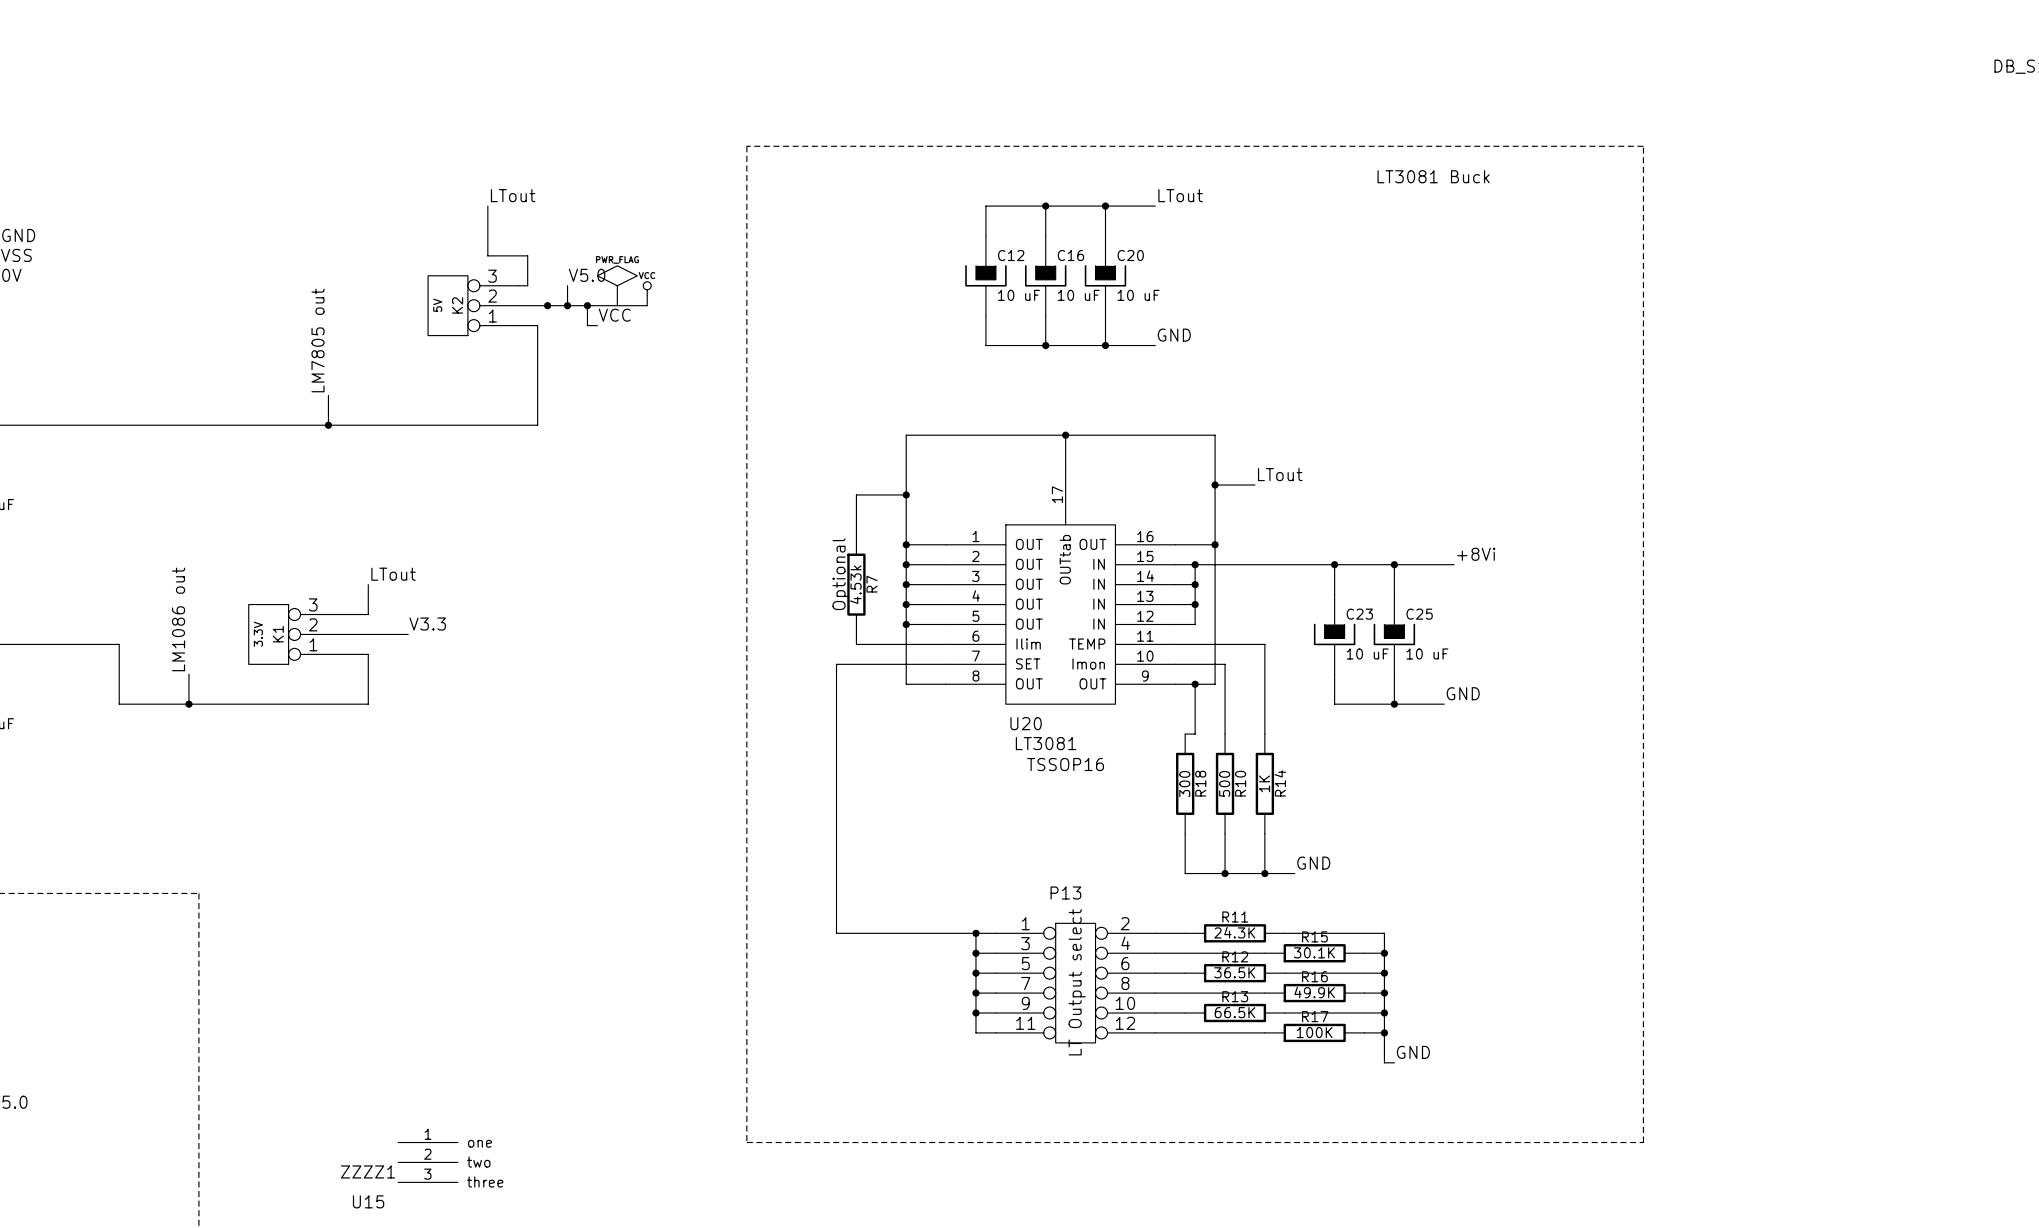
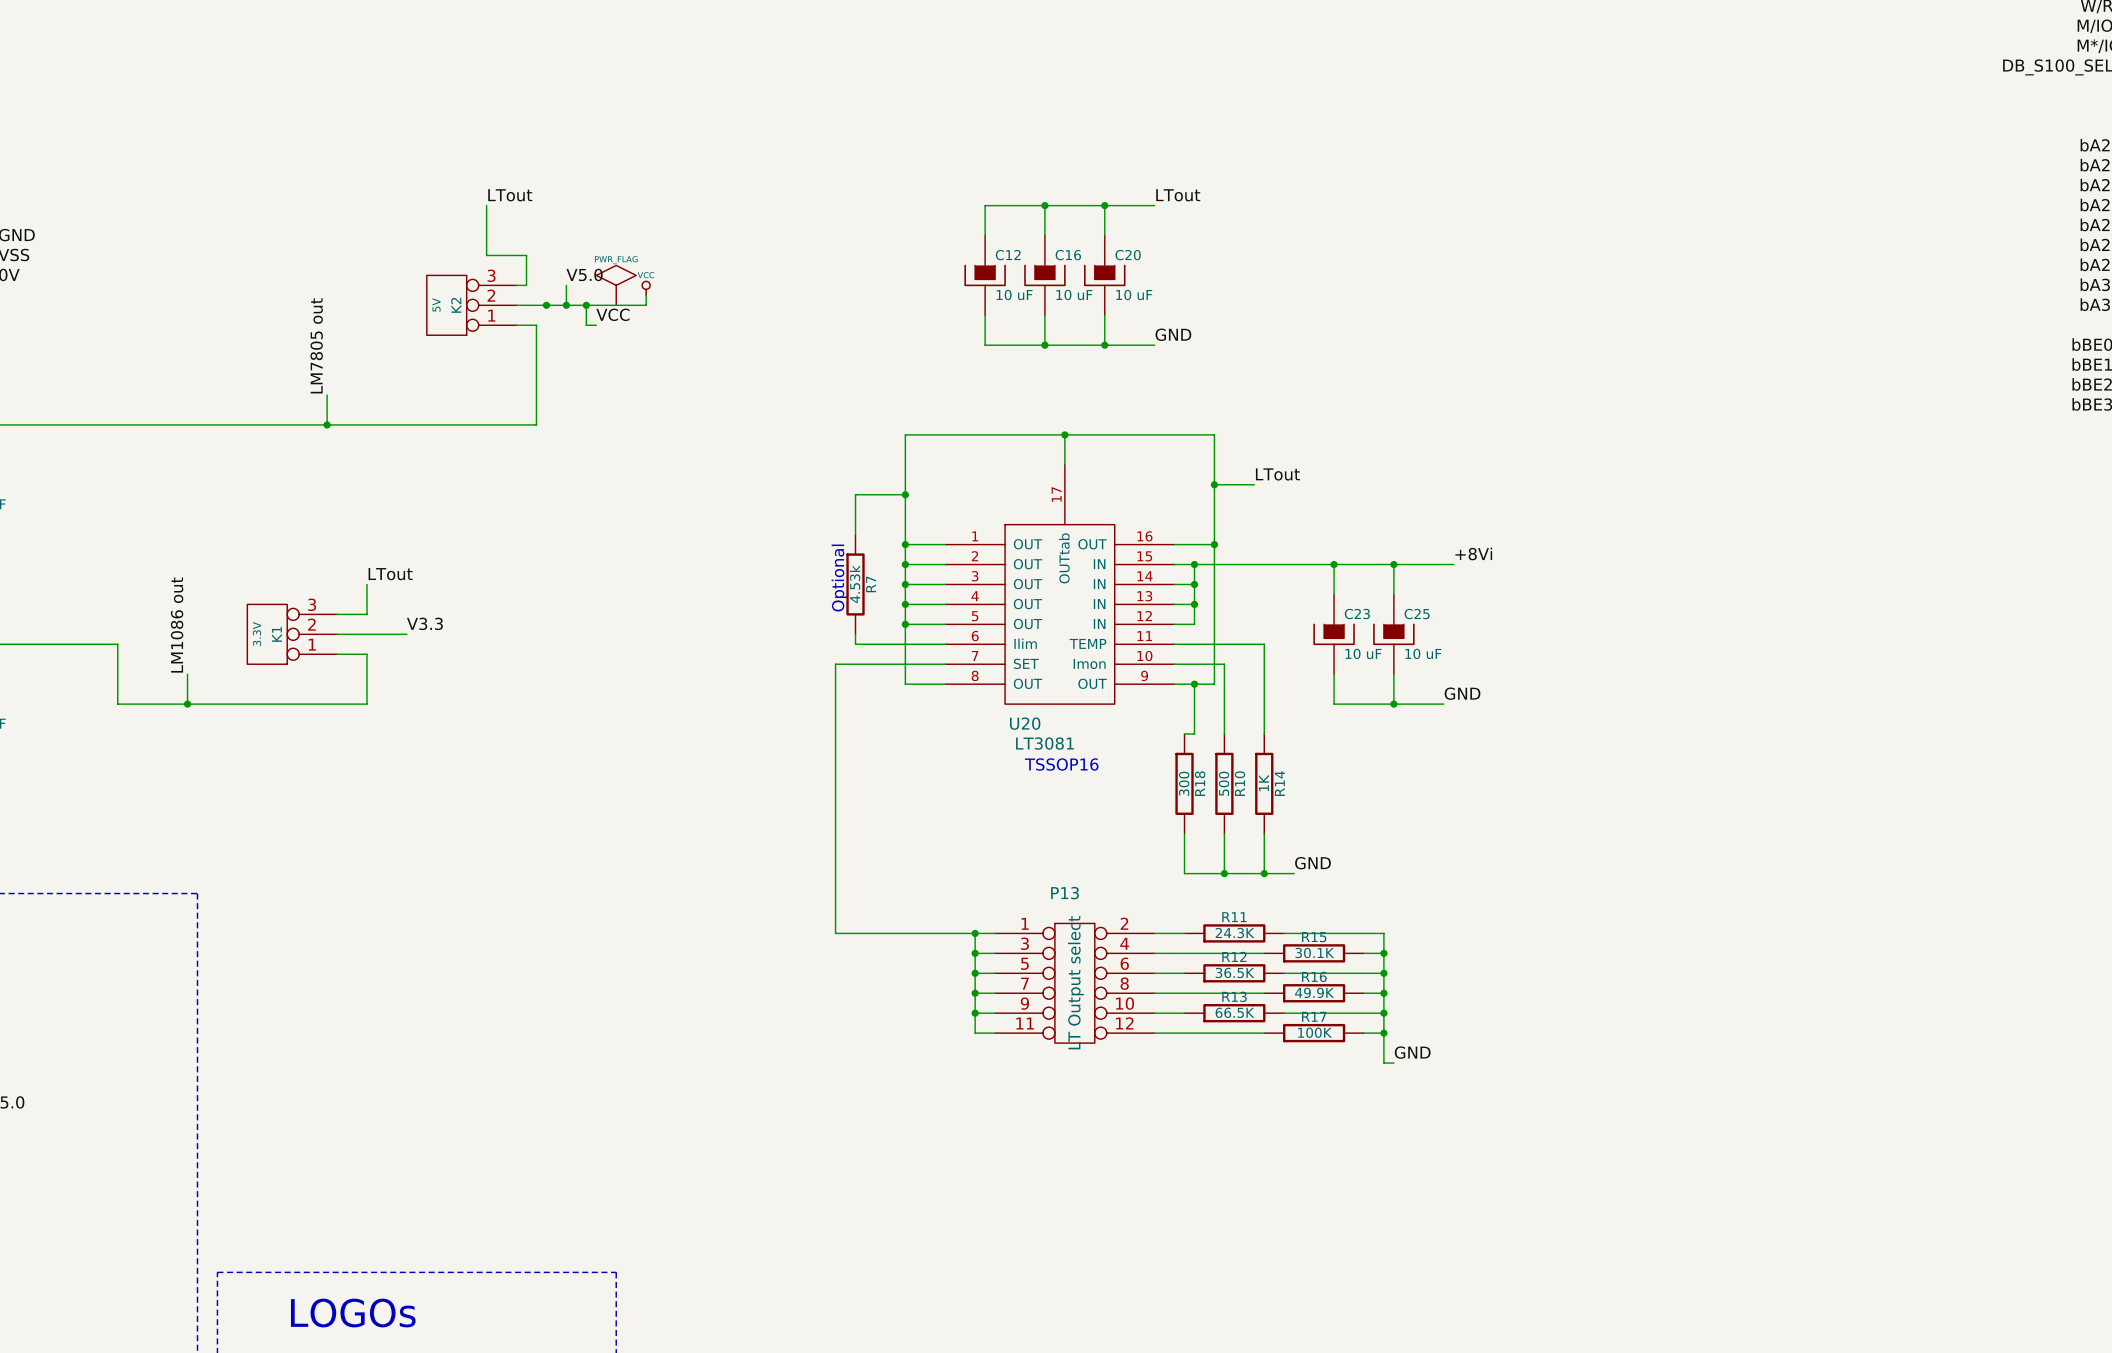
line: (746, 146) (1643, 146) (1643, 1142) (746, 1142) (746, 146) -> none
text: LT3081 Buck (1433, 176) -> none
U15: ZZZZ1 (428, 1162) -> none

